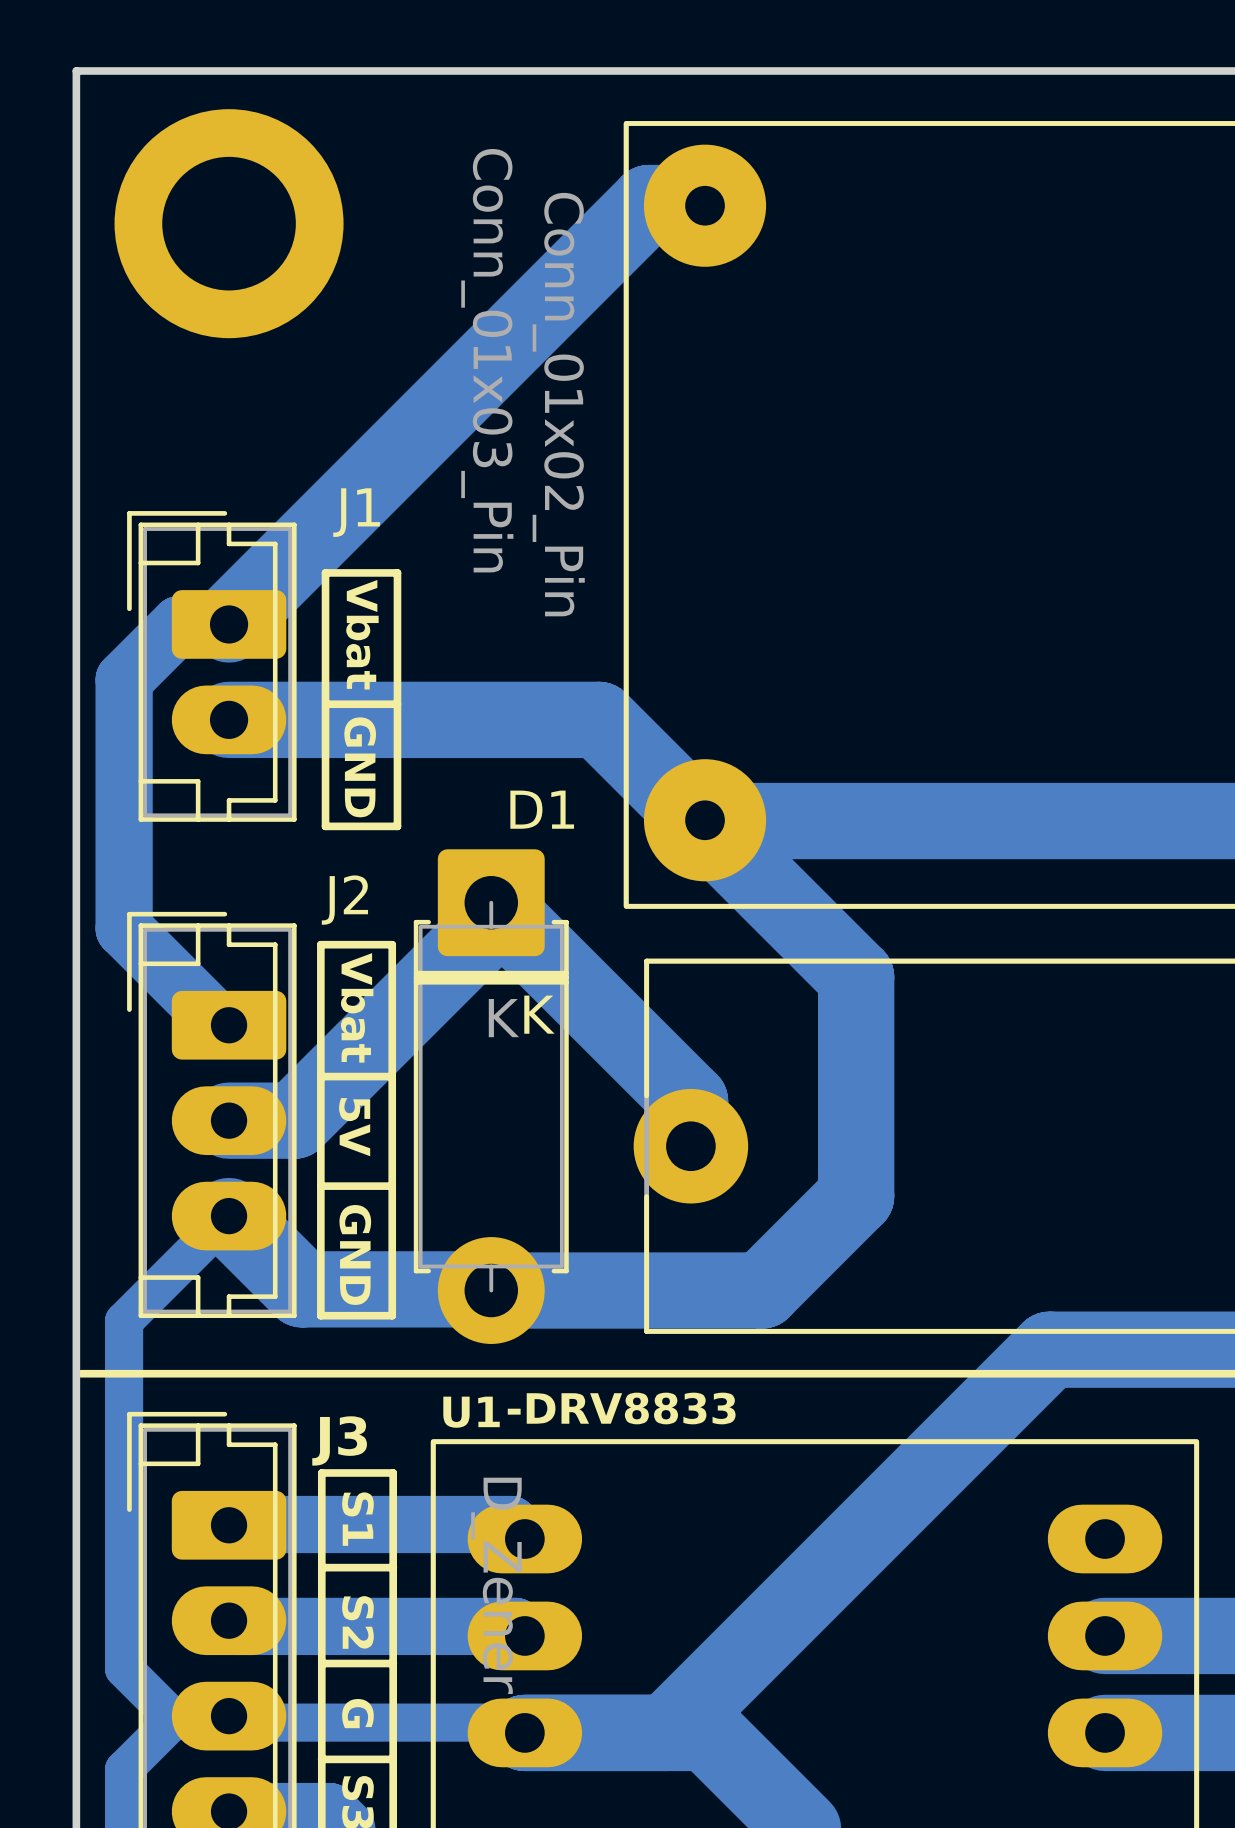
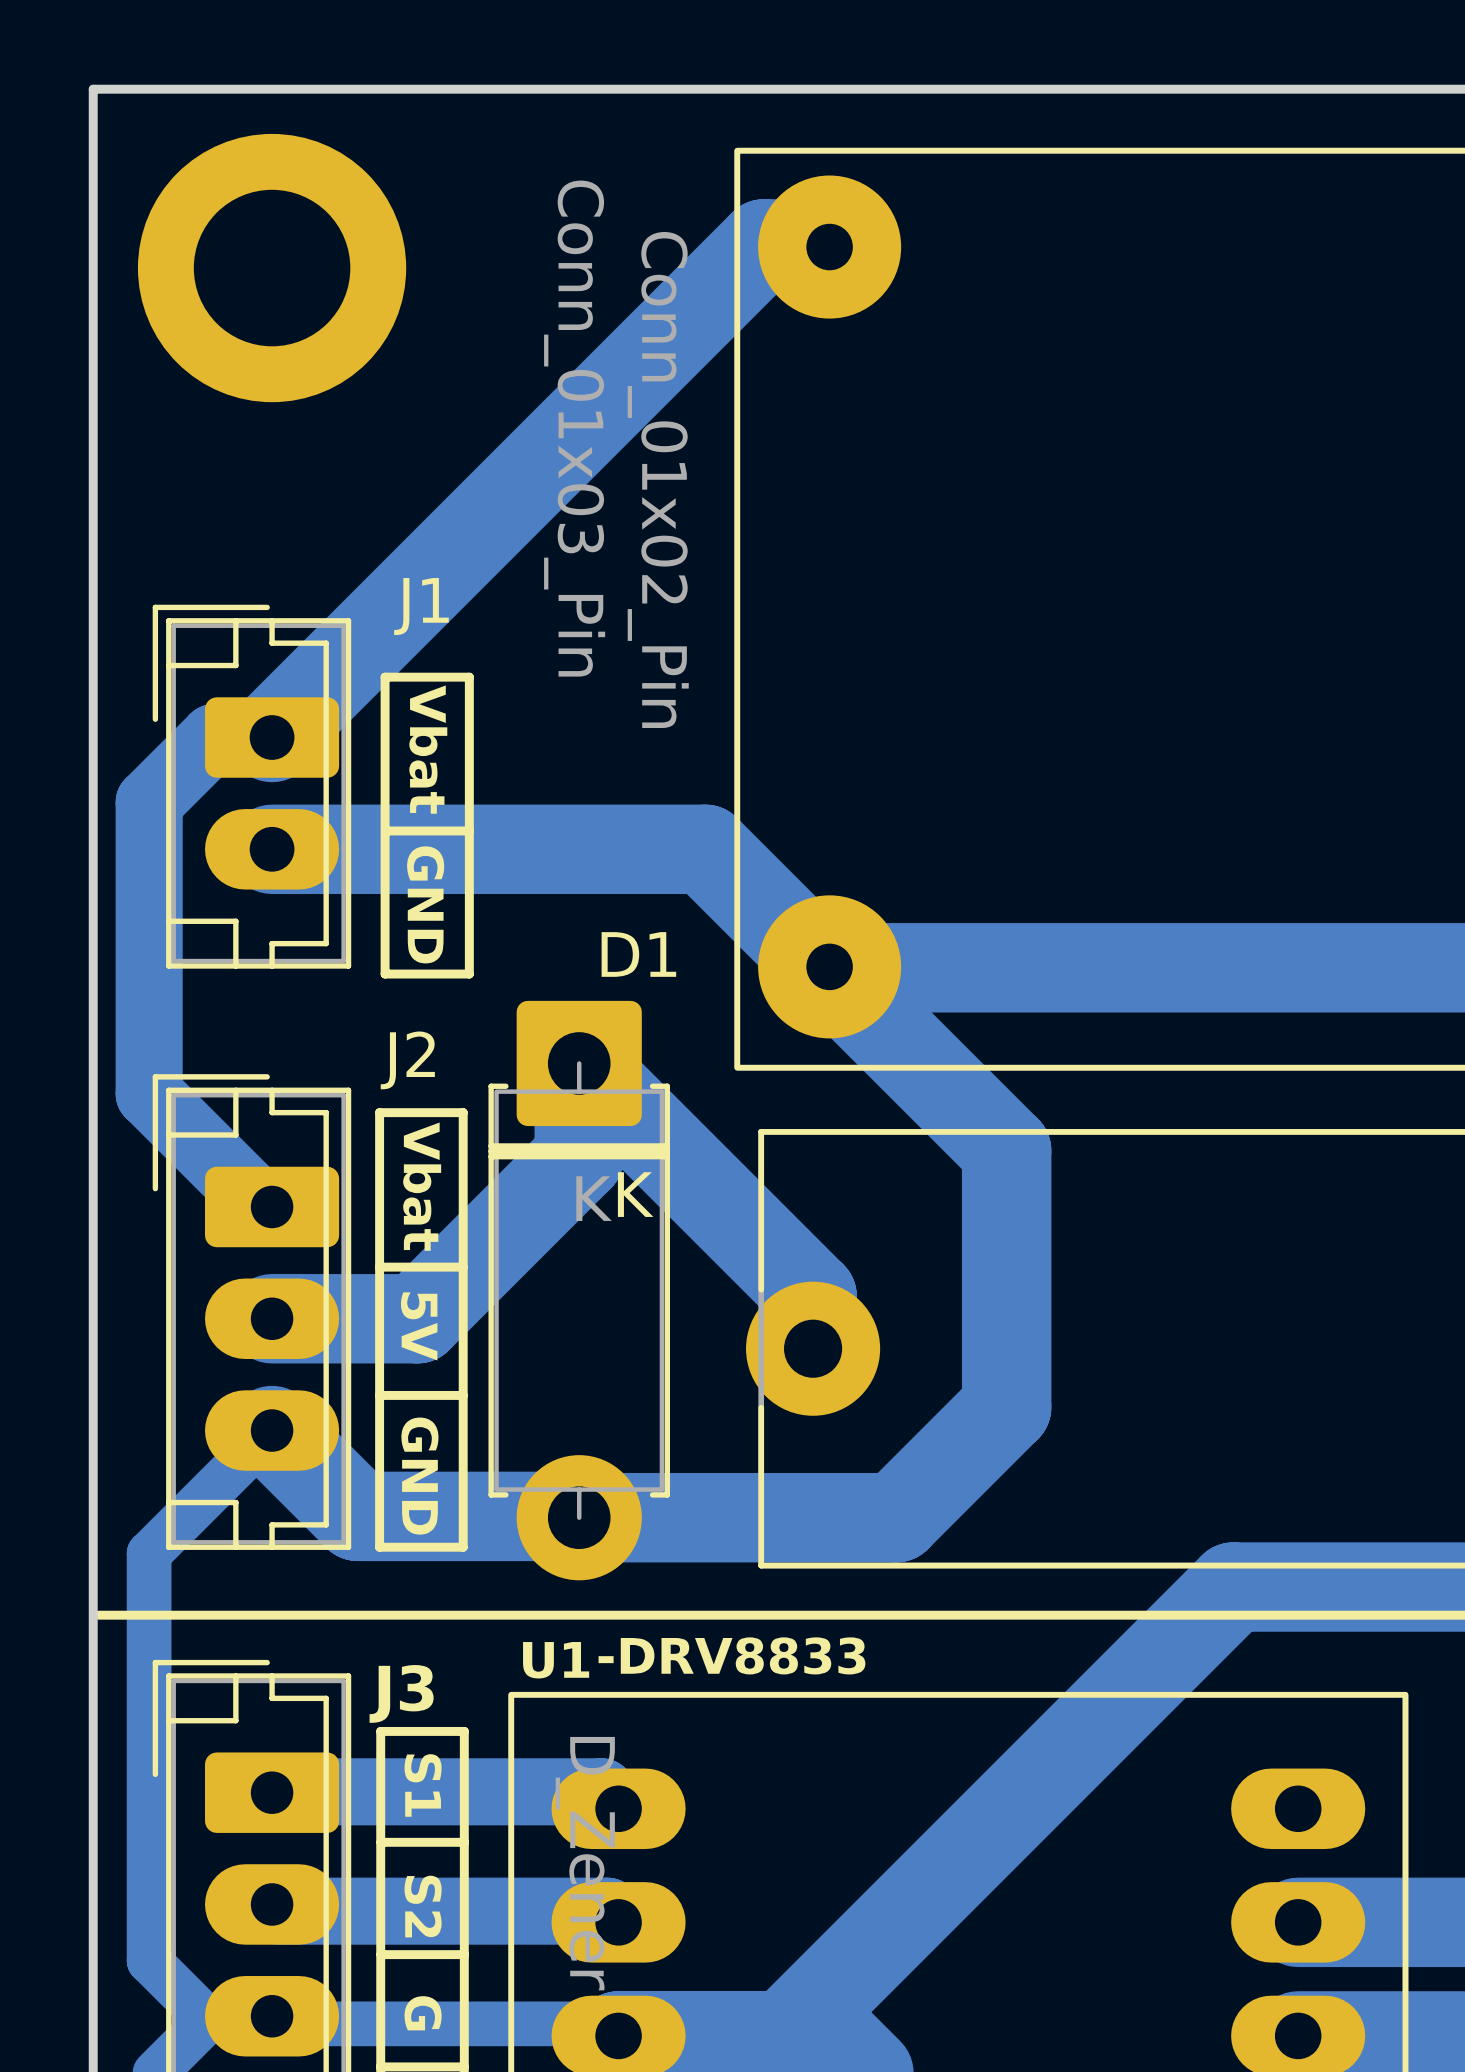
bottom track: (491, 923) (294, 1120) -> (579, 1088) (579, 1156) (417, 1318) (348, 1318)

